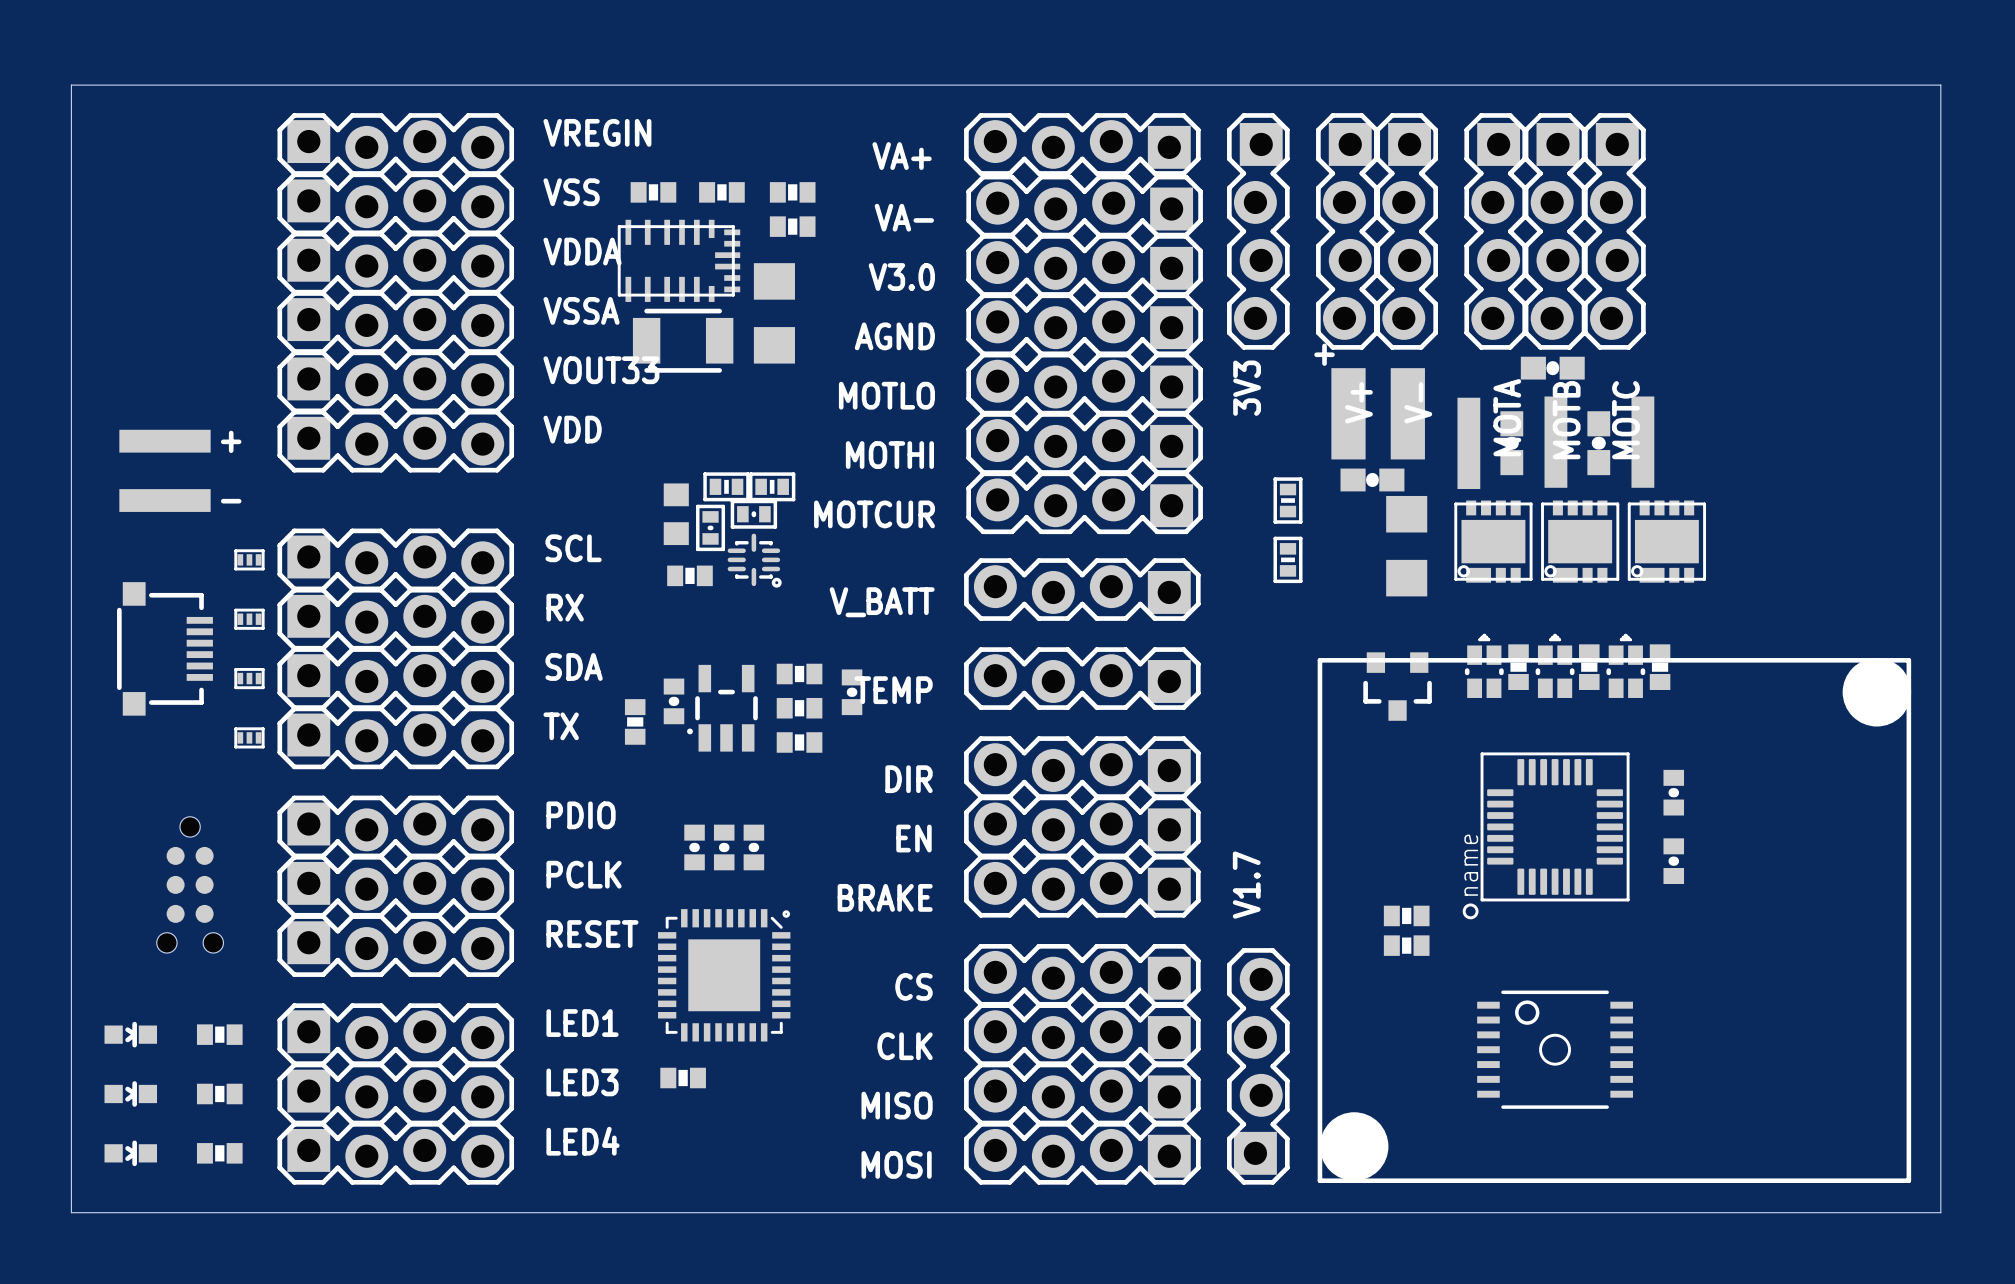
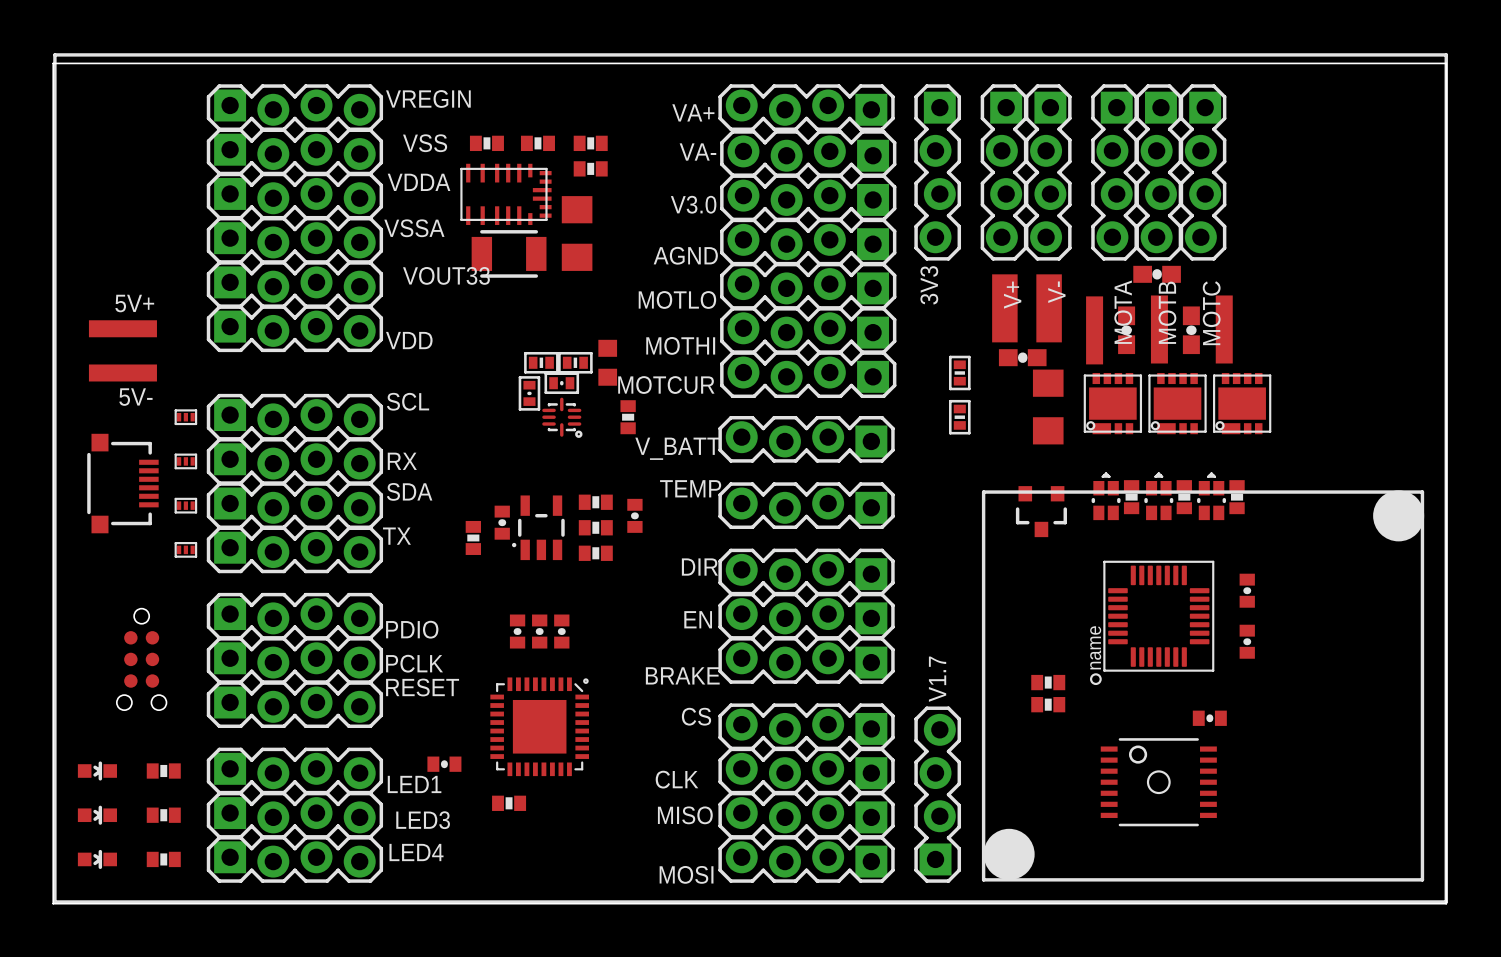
line: none -> (54, 54) (54, 901) (1446, 901) (1446, 54) (54, 54)
VREGIN name position: VREGIN (597, 132) -> VREGIN (428, 99)
VA+ name position: VA+ (902, 156) -> VA+ (693, 112)
VA- name position: VA- (904, 217) -> VA- (697, 152)
VDDA name position: VDDA (582, 251) -> VDDA (419, 182)
V3.0 name position: V3.0 (901, 277) -> V3.0 (693, 204)
VSSA name position: VSSA (581, 310) -> VSSA (414, 228)
AGND name position: AGND (894, 336) -> AGND (685, 255)
text: + (1324, 354) -> none
MOTLO name position: MOTLO (886, 395) -> MOTLO (677, 299)
text: none -> 5V+ (134, 303)
VDD name position: VDD (572, 429) -> VDD (409, 340)
text: + (231, 441) -> none
MOTHI name position: MOTHI (889, 455) -> MOTHI (680, 345)
text: - (231, 501) -> none
part position: (676, 514) -> (607, 362)
MOTCUR name position: MOTCUR (874, 514) -> MOTCUR (666, 385)
text: none -> 5V- (135, 397)
SCL name position: SCL (573, 548) -> SCL (408, 401)
part rotation: 0° (689, 575) -> 90° clockwise (628, 417)
part position: (689, 575) -> (628, 417)
V_BATT name position: V_BATT (882, 602) -> V_BATT (677, 448)
RX name position: RX (565, 607) -> RX (402, 461)
SDA name position: SDA (574, 666) -> SDA (409, 491)
TEMP name position: TEMP (893, 690) -> TEMP (690, 488)
TX name position: TX (561, 726) -> TX (396, 536)
DIR name position: DIR (909, 779) -> DIR (699, 567)
PDIO name position: PDIO (581, 815) -> PDIO (412, 629)
EN name position: EN (913, 838) -> EN (698, 619)
PCLK name position: PCLK (584, 874) -> PCLK (414, 663)
V1.7 name position: V1.7 (1246, 885) -> V1.7 (937, 679)
BRAKE name position: BRAKE (885, 897) -> BRAKE (682, 675)
RESET name position: RESET (592, 934) -> RESET (422, 687)
part: none -> (1209, 718)
CS name position: CS (913, 986) -> CS (696, 716)
LED1 name position: LED1 (582, 1023) -> LED1 (414, 784)
part: none -> (444, 764)
LED3 name position: LED3 (582, 1082) -> LED3 (423, 820)
MISO name position: MISO (897, 1105) -> MISO (685, 815)
LED4 name position: LED4 (583, 1141) -> LED4 (416, 852)
MOSI name position: MOSI (896, 1164) -> MOSI (686, 874)

